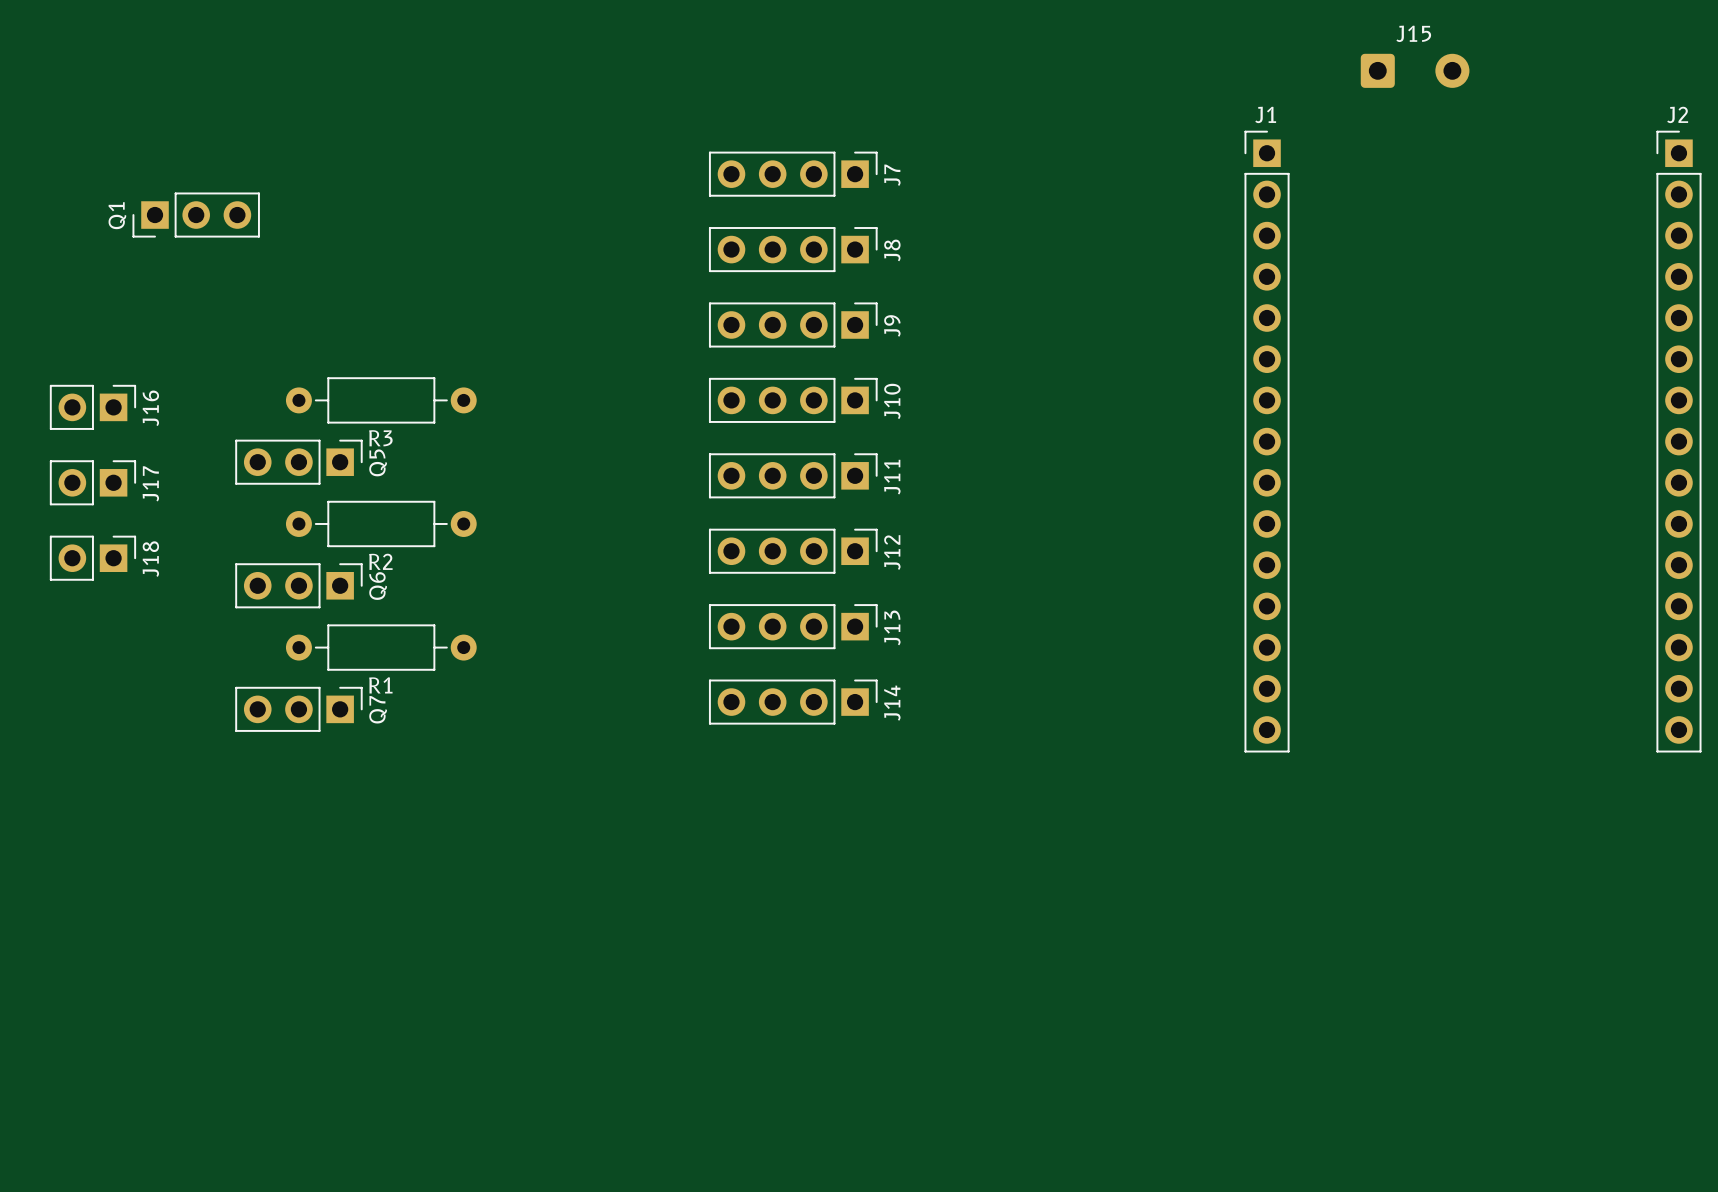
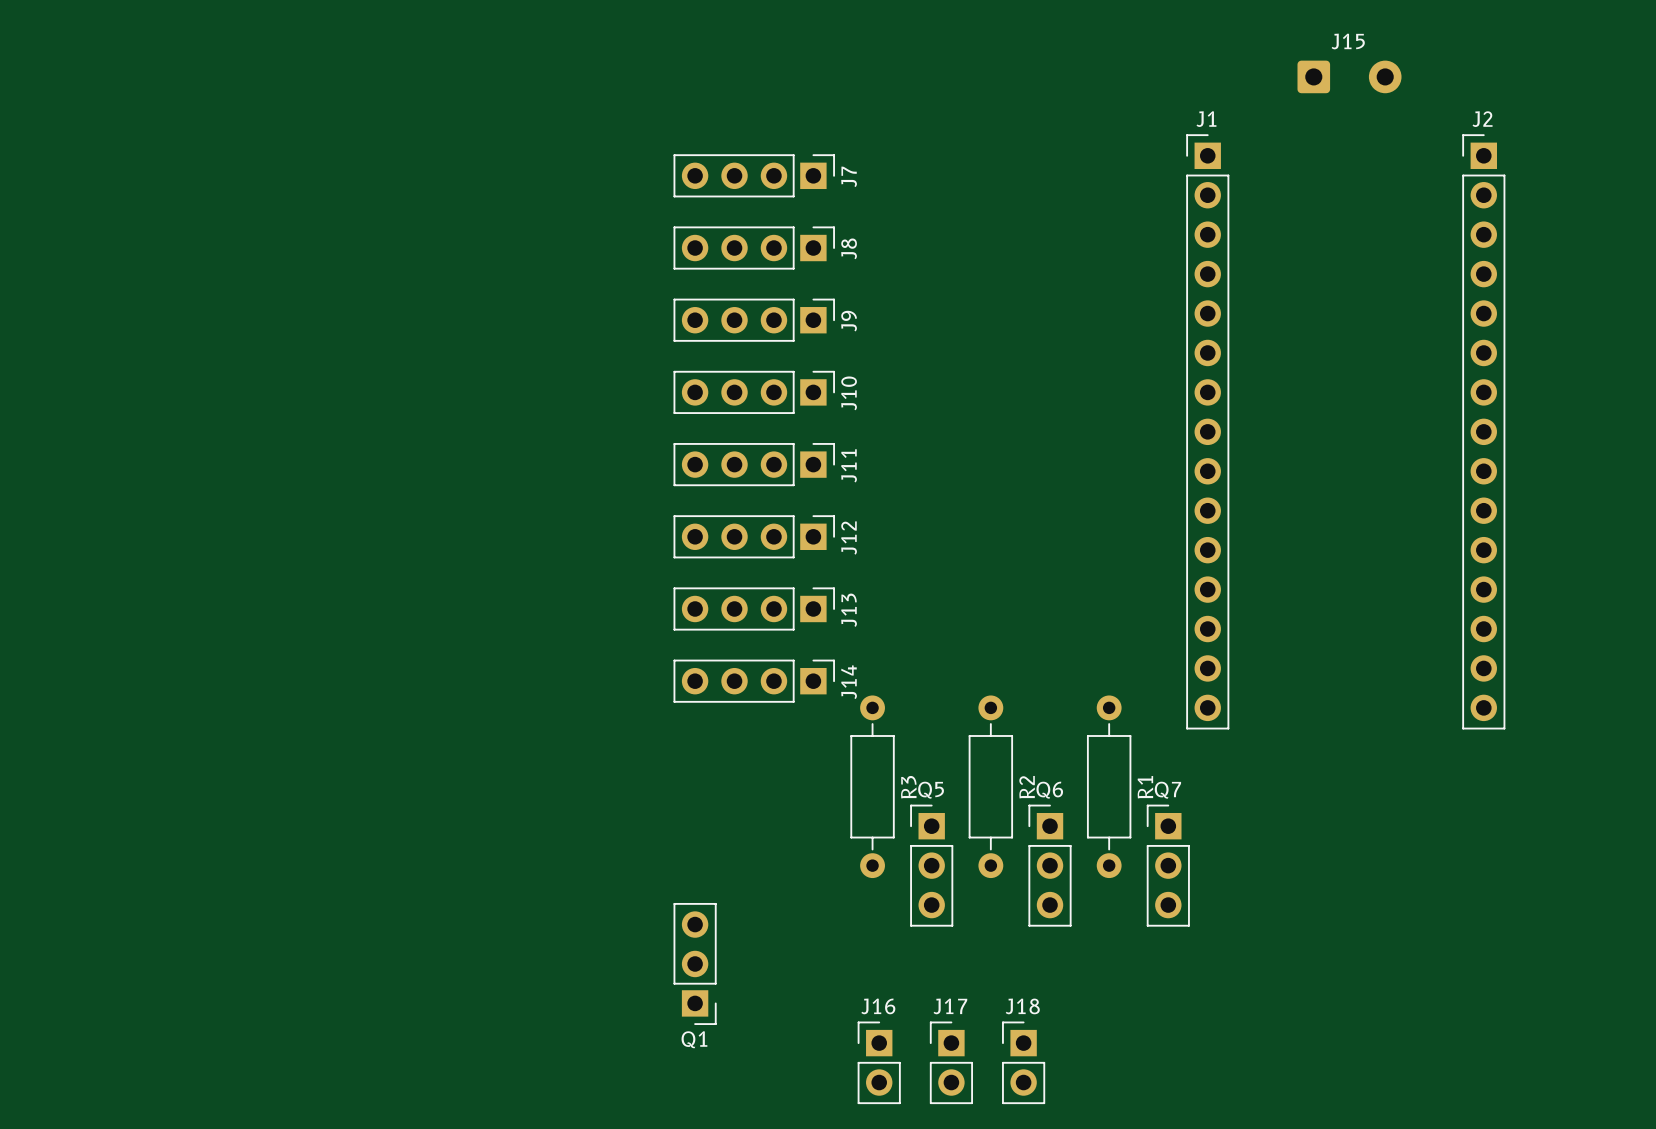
Q1 rotation: 0° (196, 215) -> 90° counterclockwise (695, 963)
Q1 position: (196, 215) -> (695, 963)
R3 rotation: 0° (381, 400) -> 90° clockwise (872, 786)
R3 position: (381, 400) -> (872, 786)
J16 rotation: 0° (92, 407) -> 90° counterclockwise (879, 1062)
J16 position: (92, 407) -> (879, 1062)
R3 name position: R3 (380, 438) -> R3 (908, 787)
J2 position: (1678, 441) -> (1483, 431)
Q5 rotation: 0° (298, 462) -> 90° counterclockwise (931, 865)
Q5 position: (298, 462) -> (931, 865)
J17 rotation: 0° (92, 482) -> 90° counterclockwise (951, 1062)
J17 position: (92, 482) -> (951, 1062)
R2 rotation: 0° (381, 523) -> 90° clockwise (990, 786)
R2 position: (381, 523) -> (990, 786)
J18 rotation: 0° (92, 558) -> 90° counterclockwise (1023, 1062)
J18 position: (92, 558) -> (1023, 1062)
R2 name position: R2 (380, 561) -> R2 (1027, 787)
Q6 rotation: 0° (298, 585) -> 90° counterclockwise (1050, 865)
Q6 position: (298, 585) -> (1050, 865)
R1 rotation: 0° (381, 647) -> 90° clockwise (1109, 786)
R1 position: (381, 647) -> (1109, 786)
R1 name position: R1 (380, 685) -> R1 (1145, 787)
Q7 rotation: 0° (298, 709) -> 90° counterclockwise (1168, 865)
Q7 position: (298, 709) -> (1168, 865)

